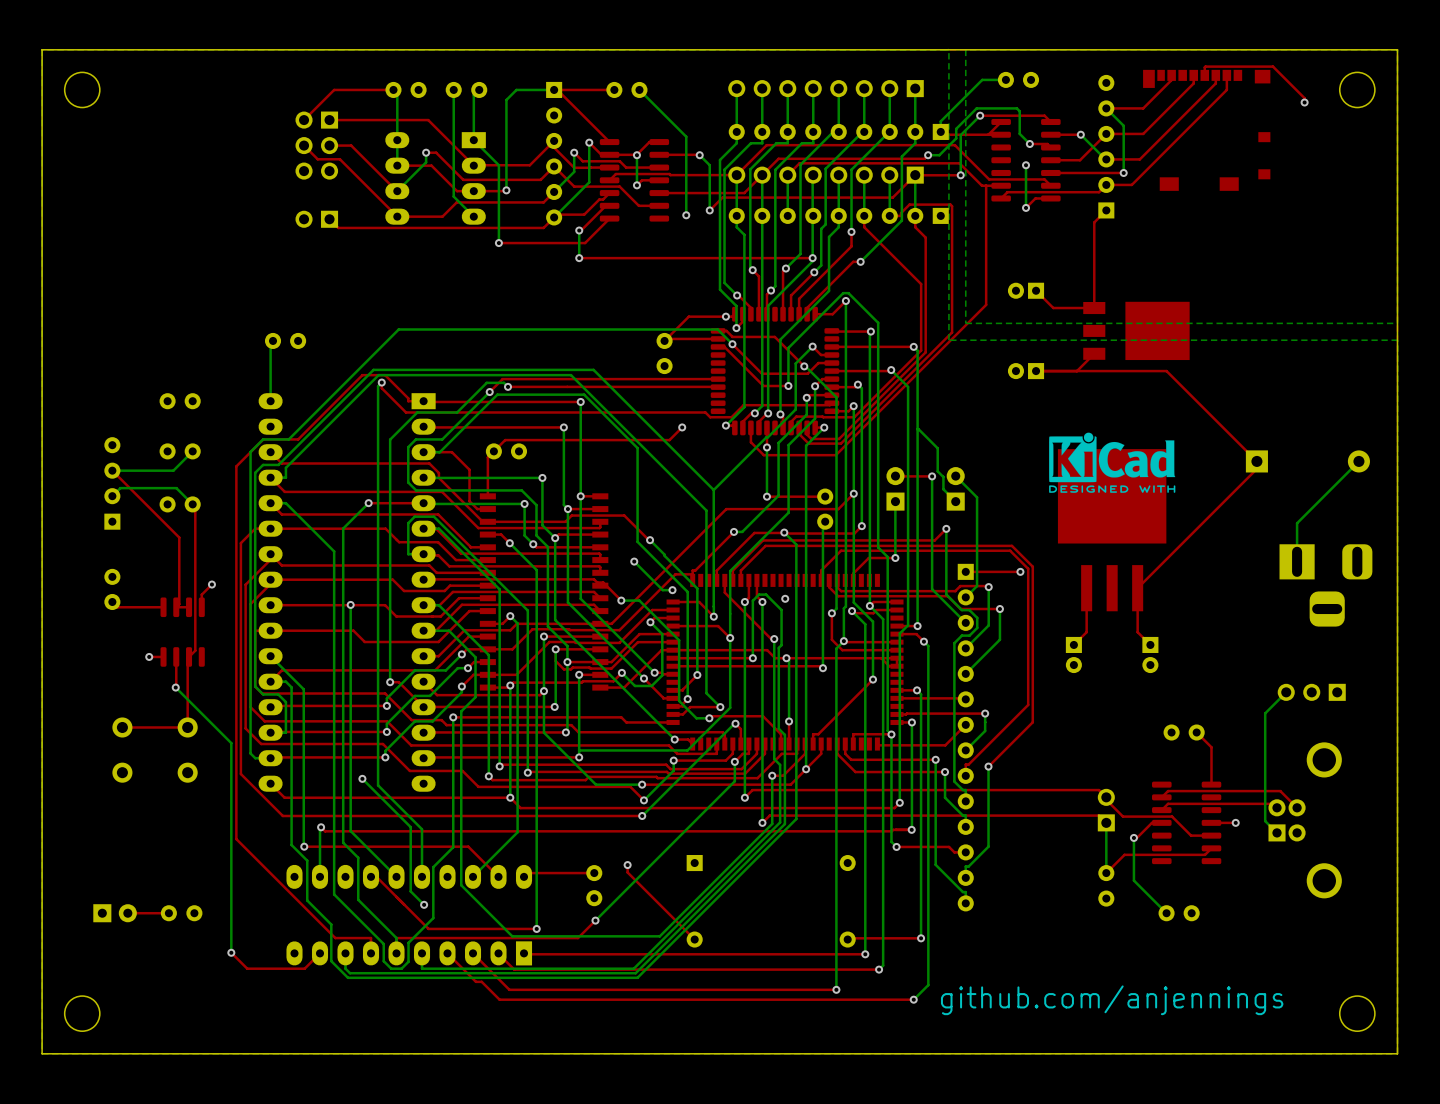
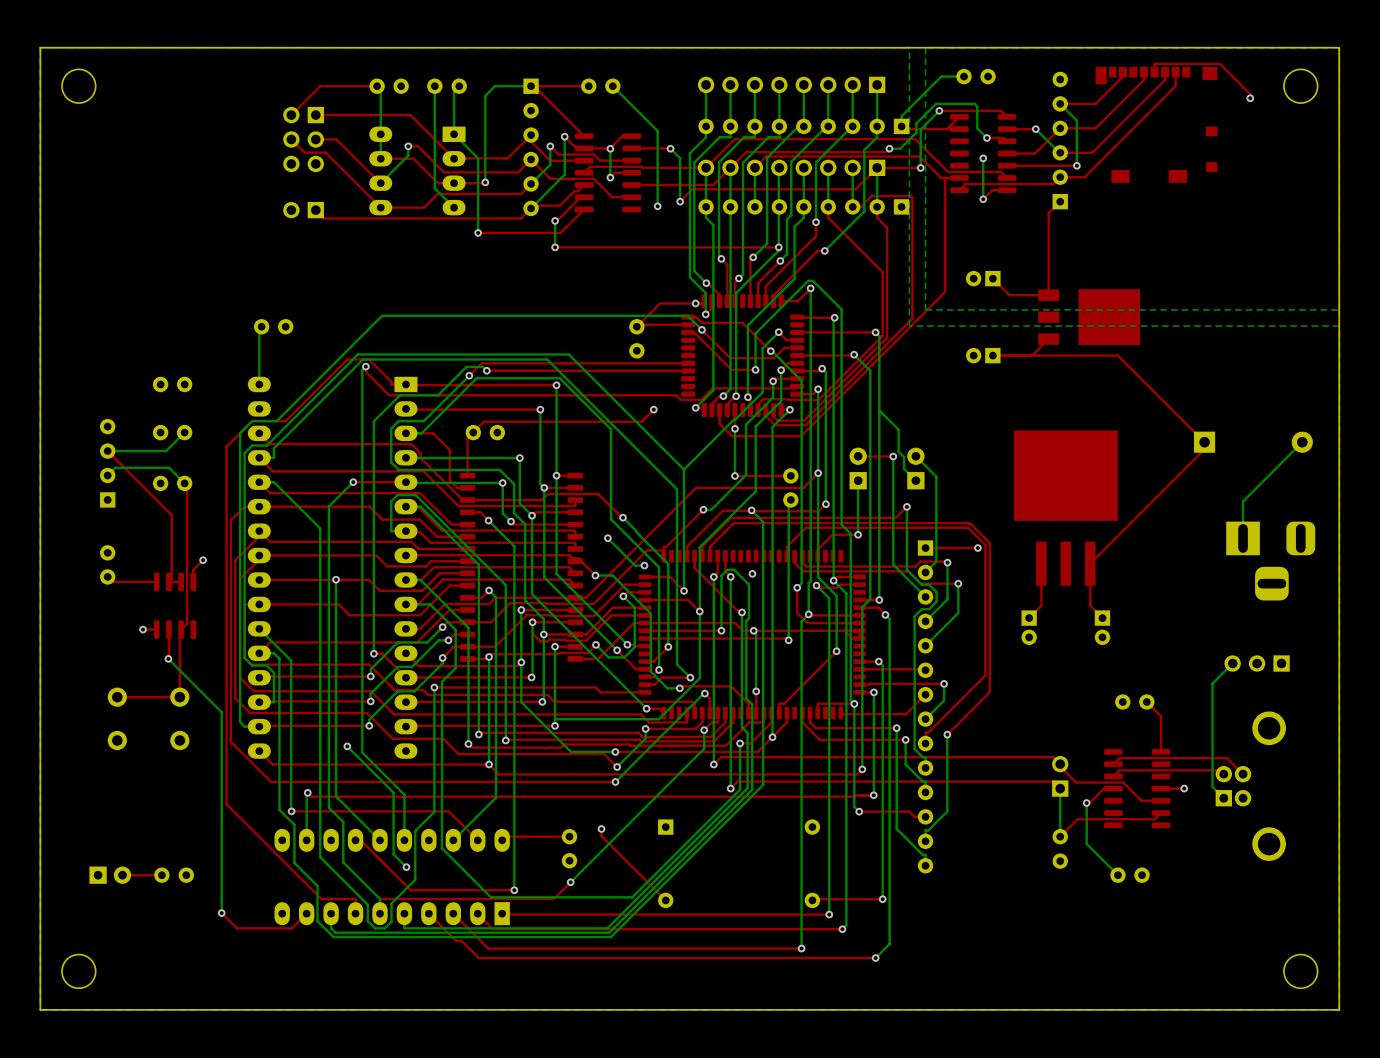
drawing: [1049, 432, 1176, 493] -> none
text: github.com/anjennings (1112, 1000) -> none

